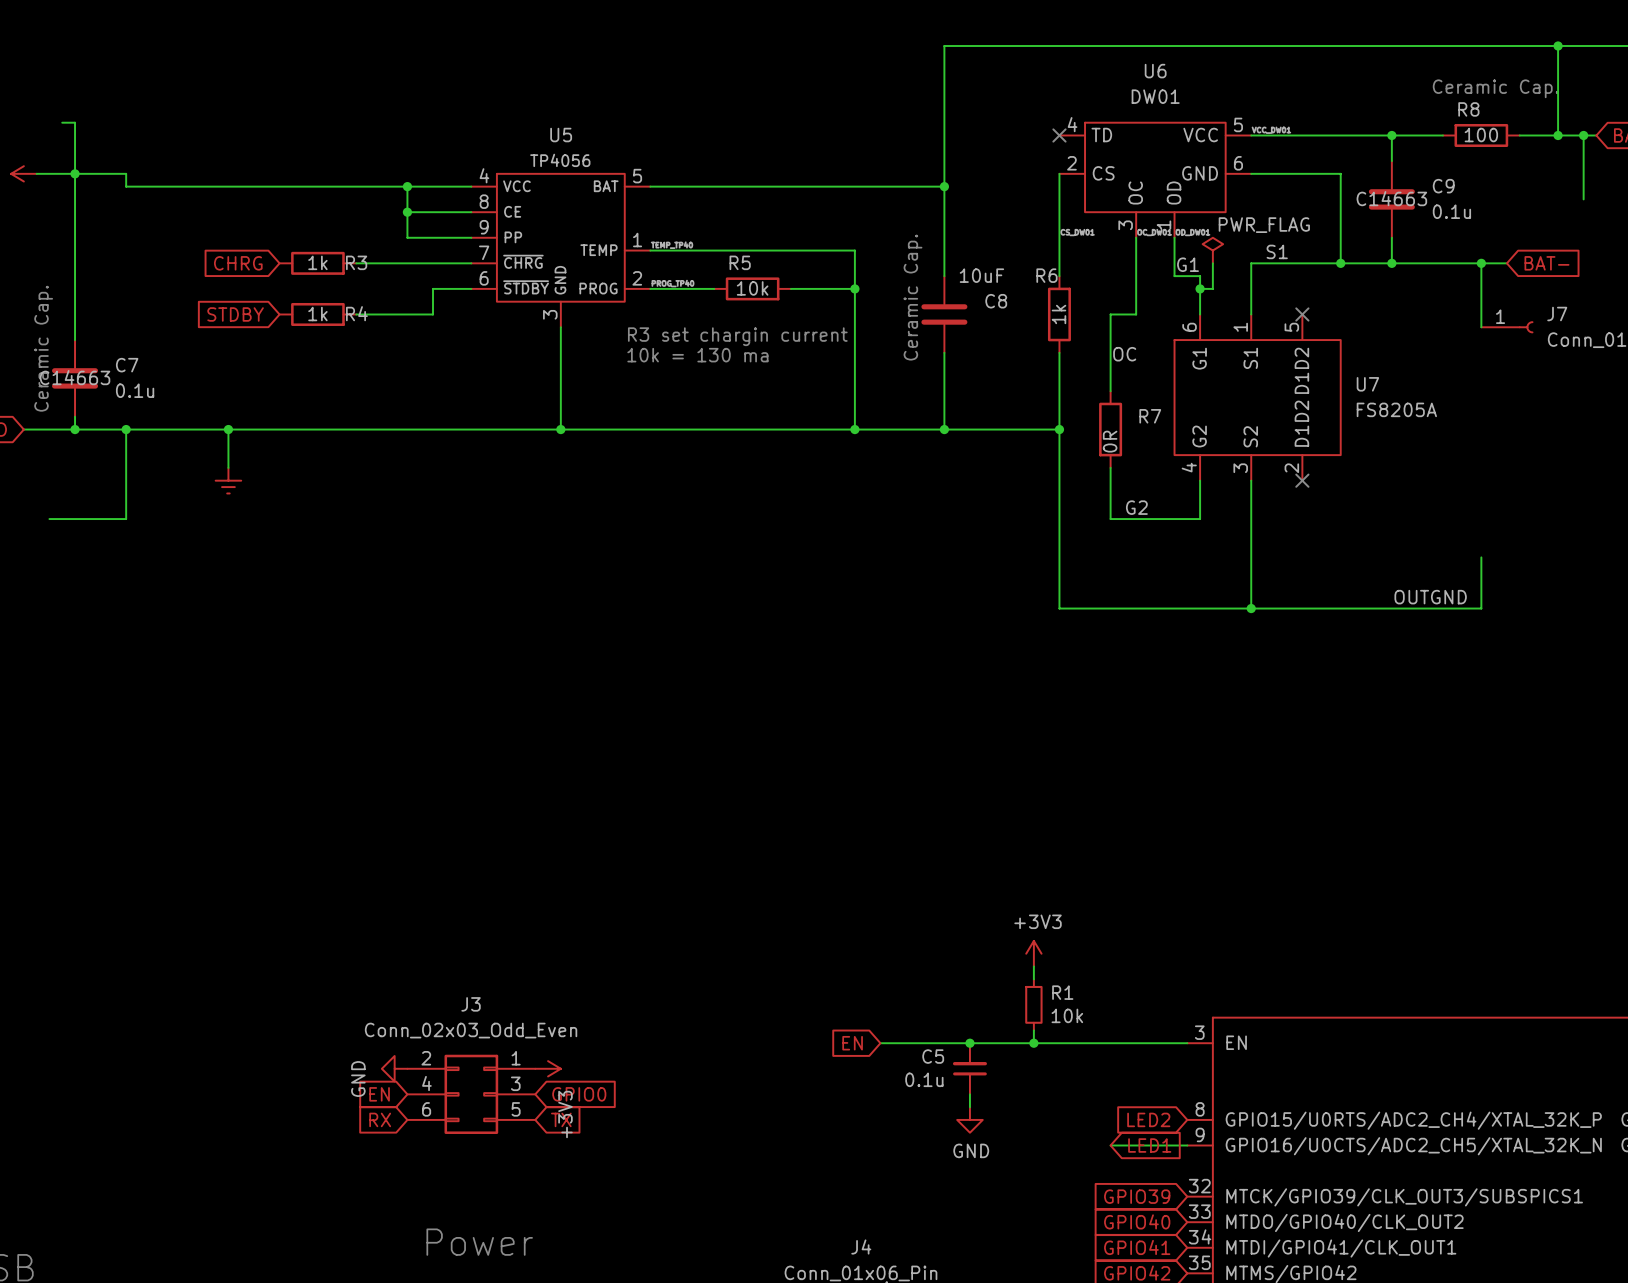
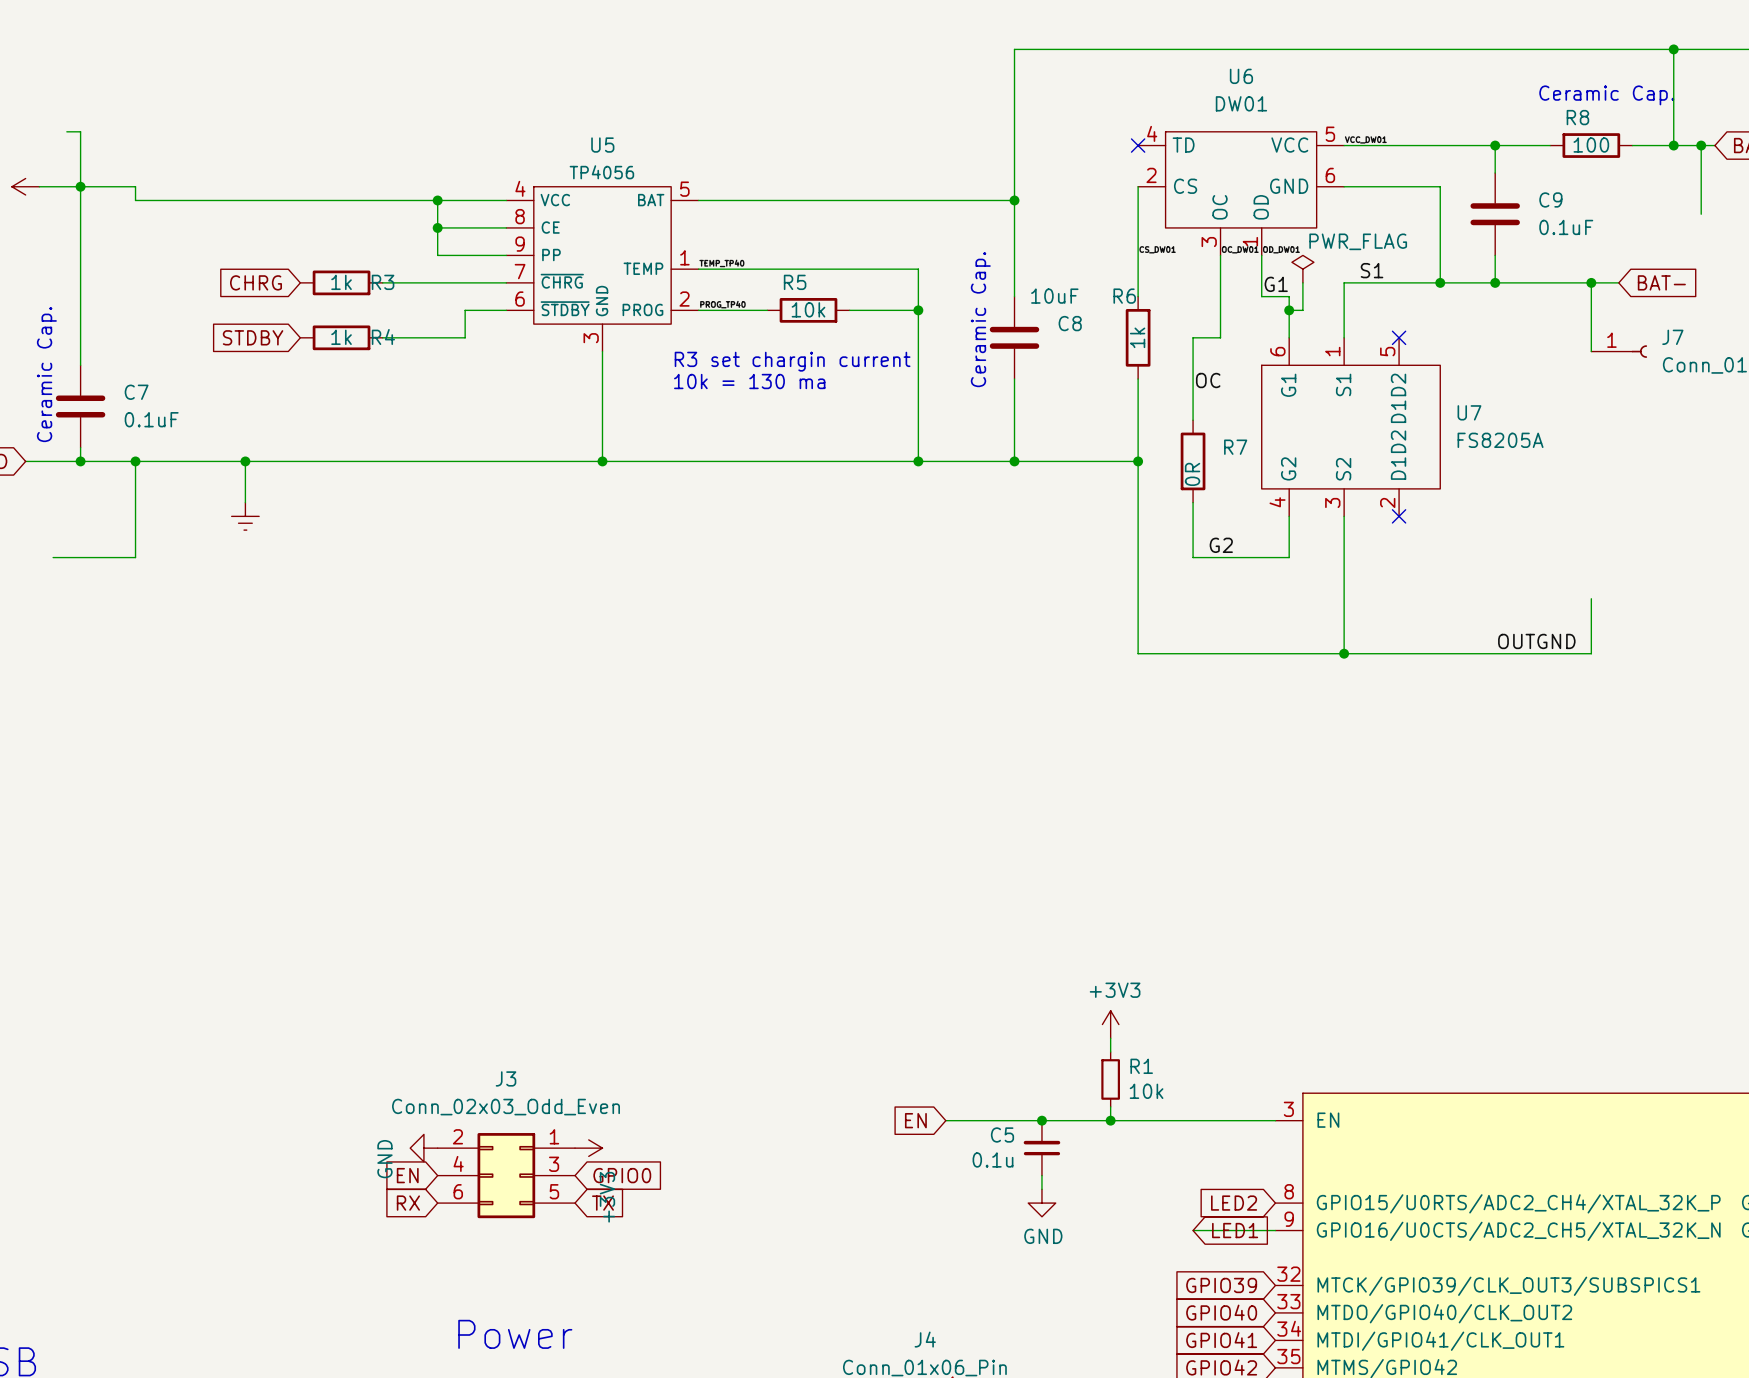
C9 text: C14663 (1391, 198) -> none
C9 value: 0.1u (1451, 211) -> 0.1uF (1566, 227)
C7 text: C14663 (75, 377) -> none
C7 value: 0.1u (135, 390) -> 0.1uF (151, 419)

